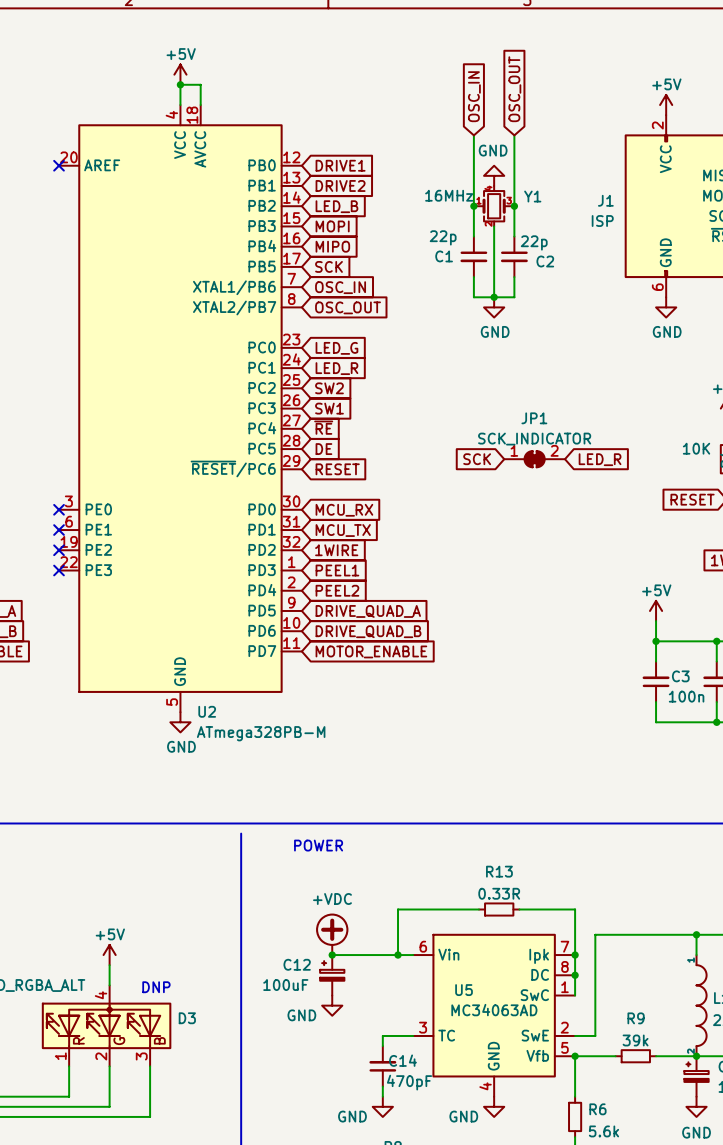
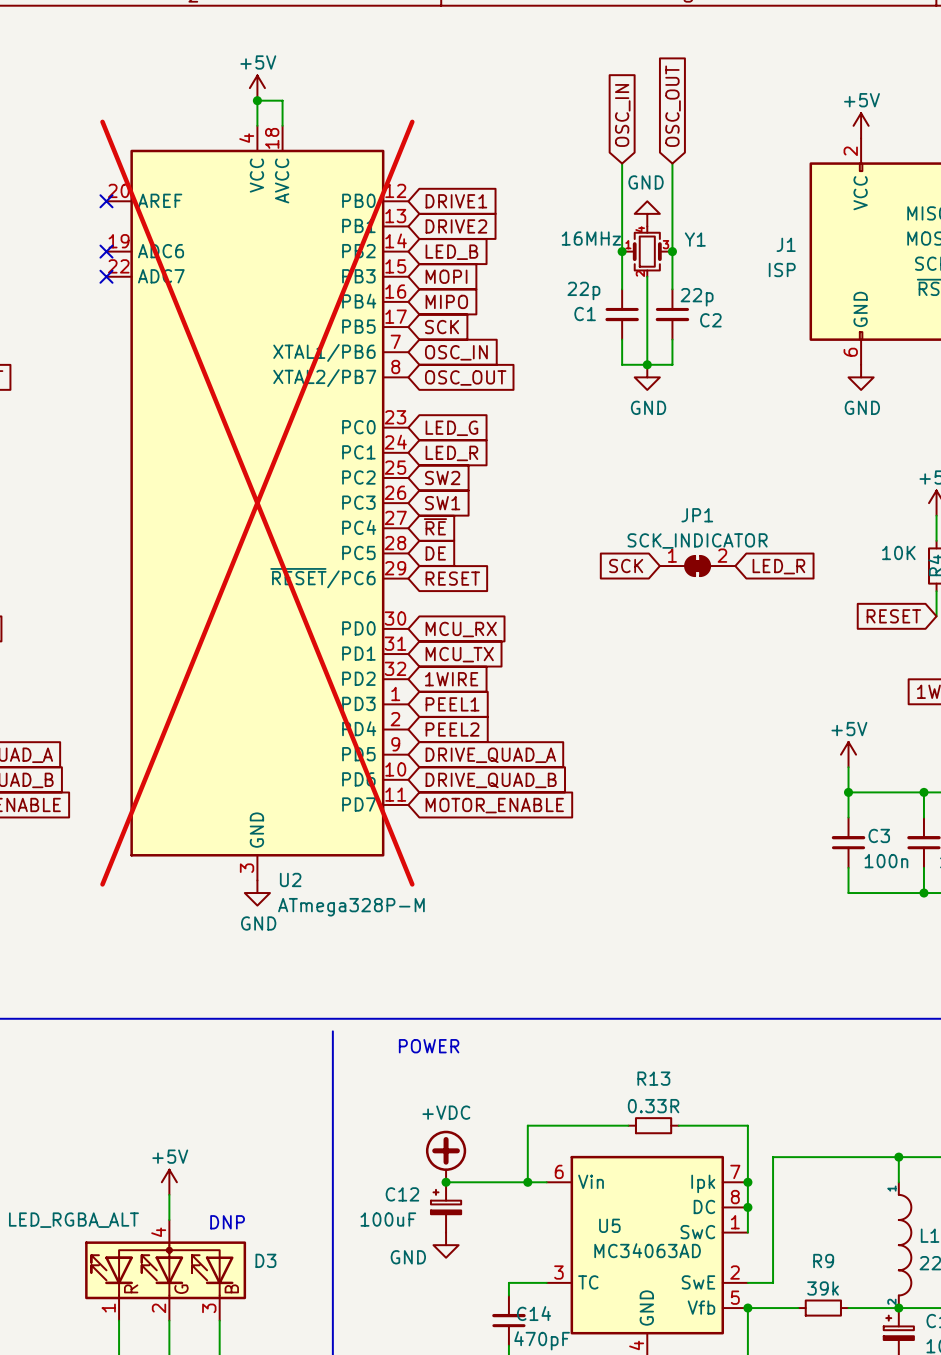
U2 symbol: [59, 105, 302, 713] -> [106, 125, 409, 881]
no-connect mark: none -> (106, 251)
no-connect mark: none -> (106, 276)
U2 do-not-place cross: none -> (257, 503)
no-connect mark: (59, 509) -> none
no-connect mark: (59, 530) -> none
no-connect mark: (59, 550) -> none
no-connect mark: (59, 570) -> none
U2 value: ATmega328PB-M (261, 733) -> ATmega328P-M (351, 907)

